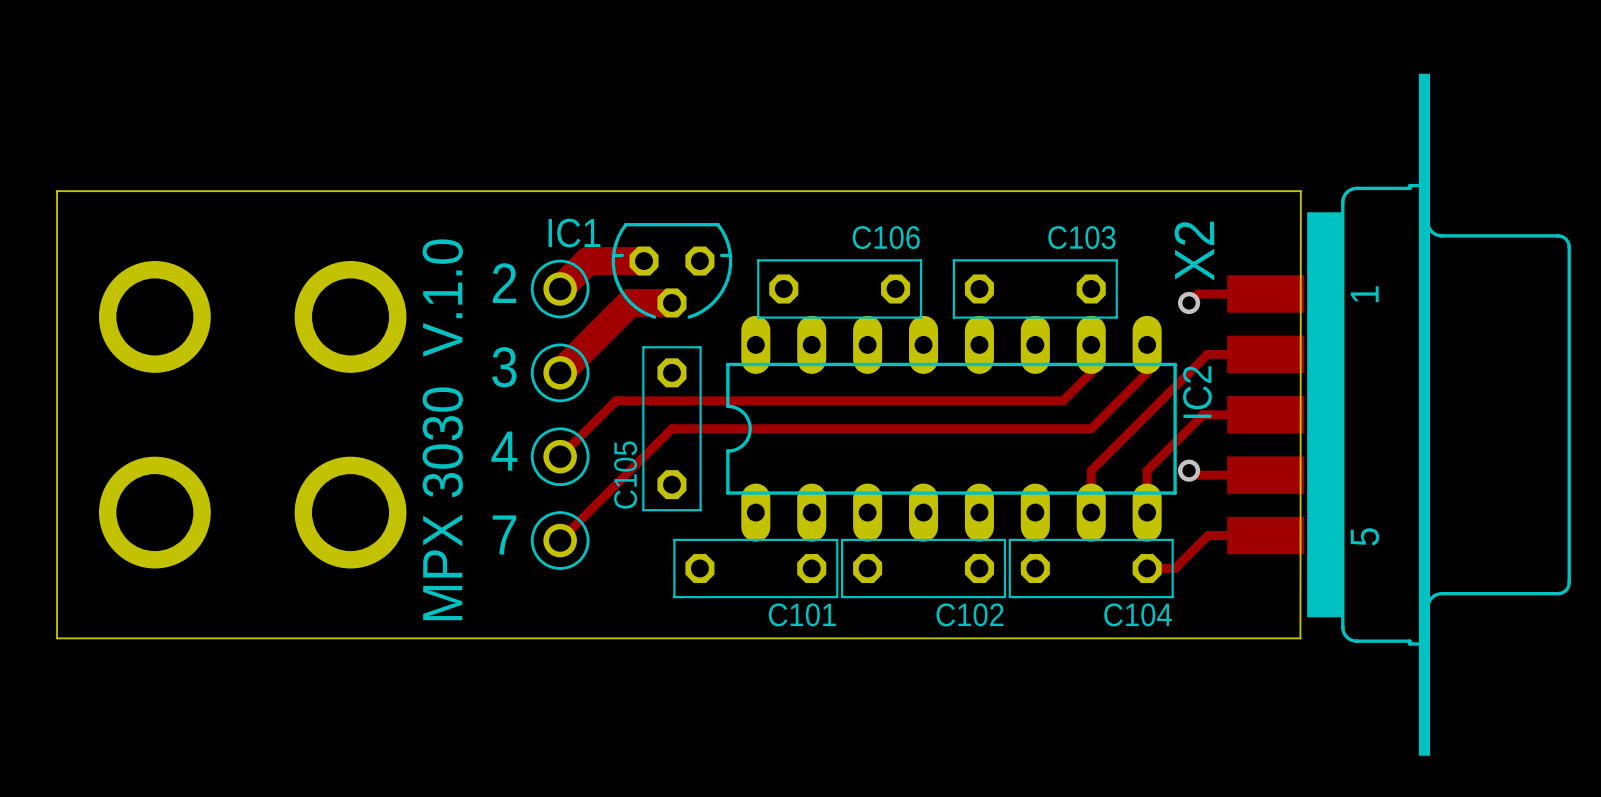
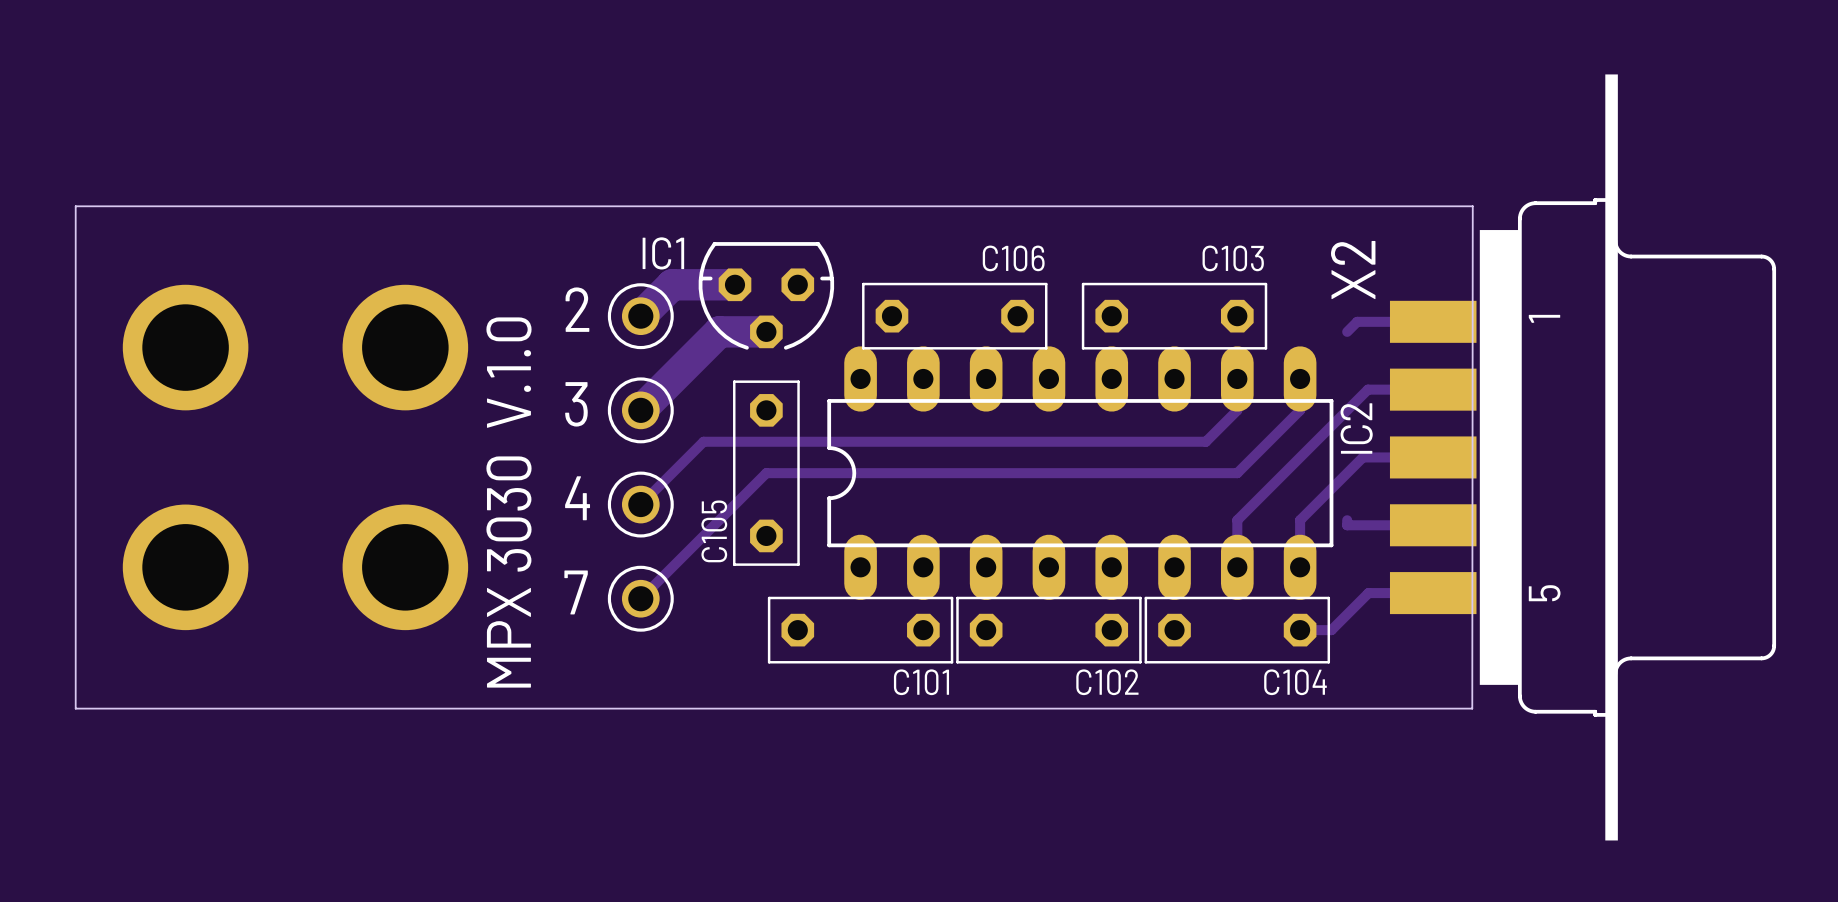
via: (1189, 302) -> none
via: (1189, 470) -> none

